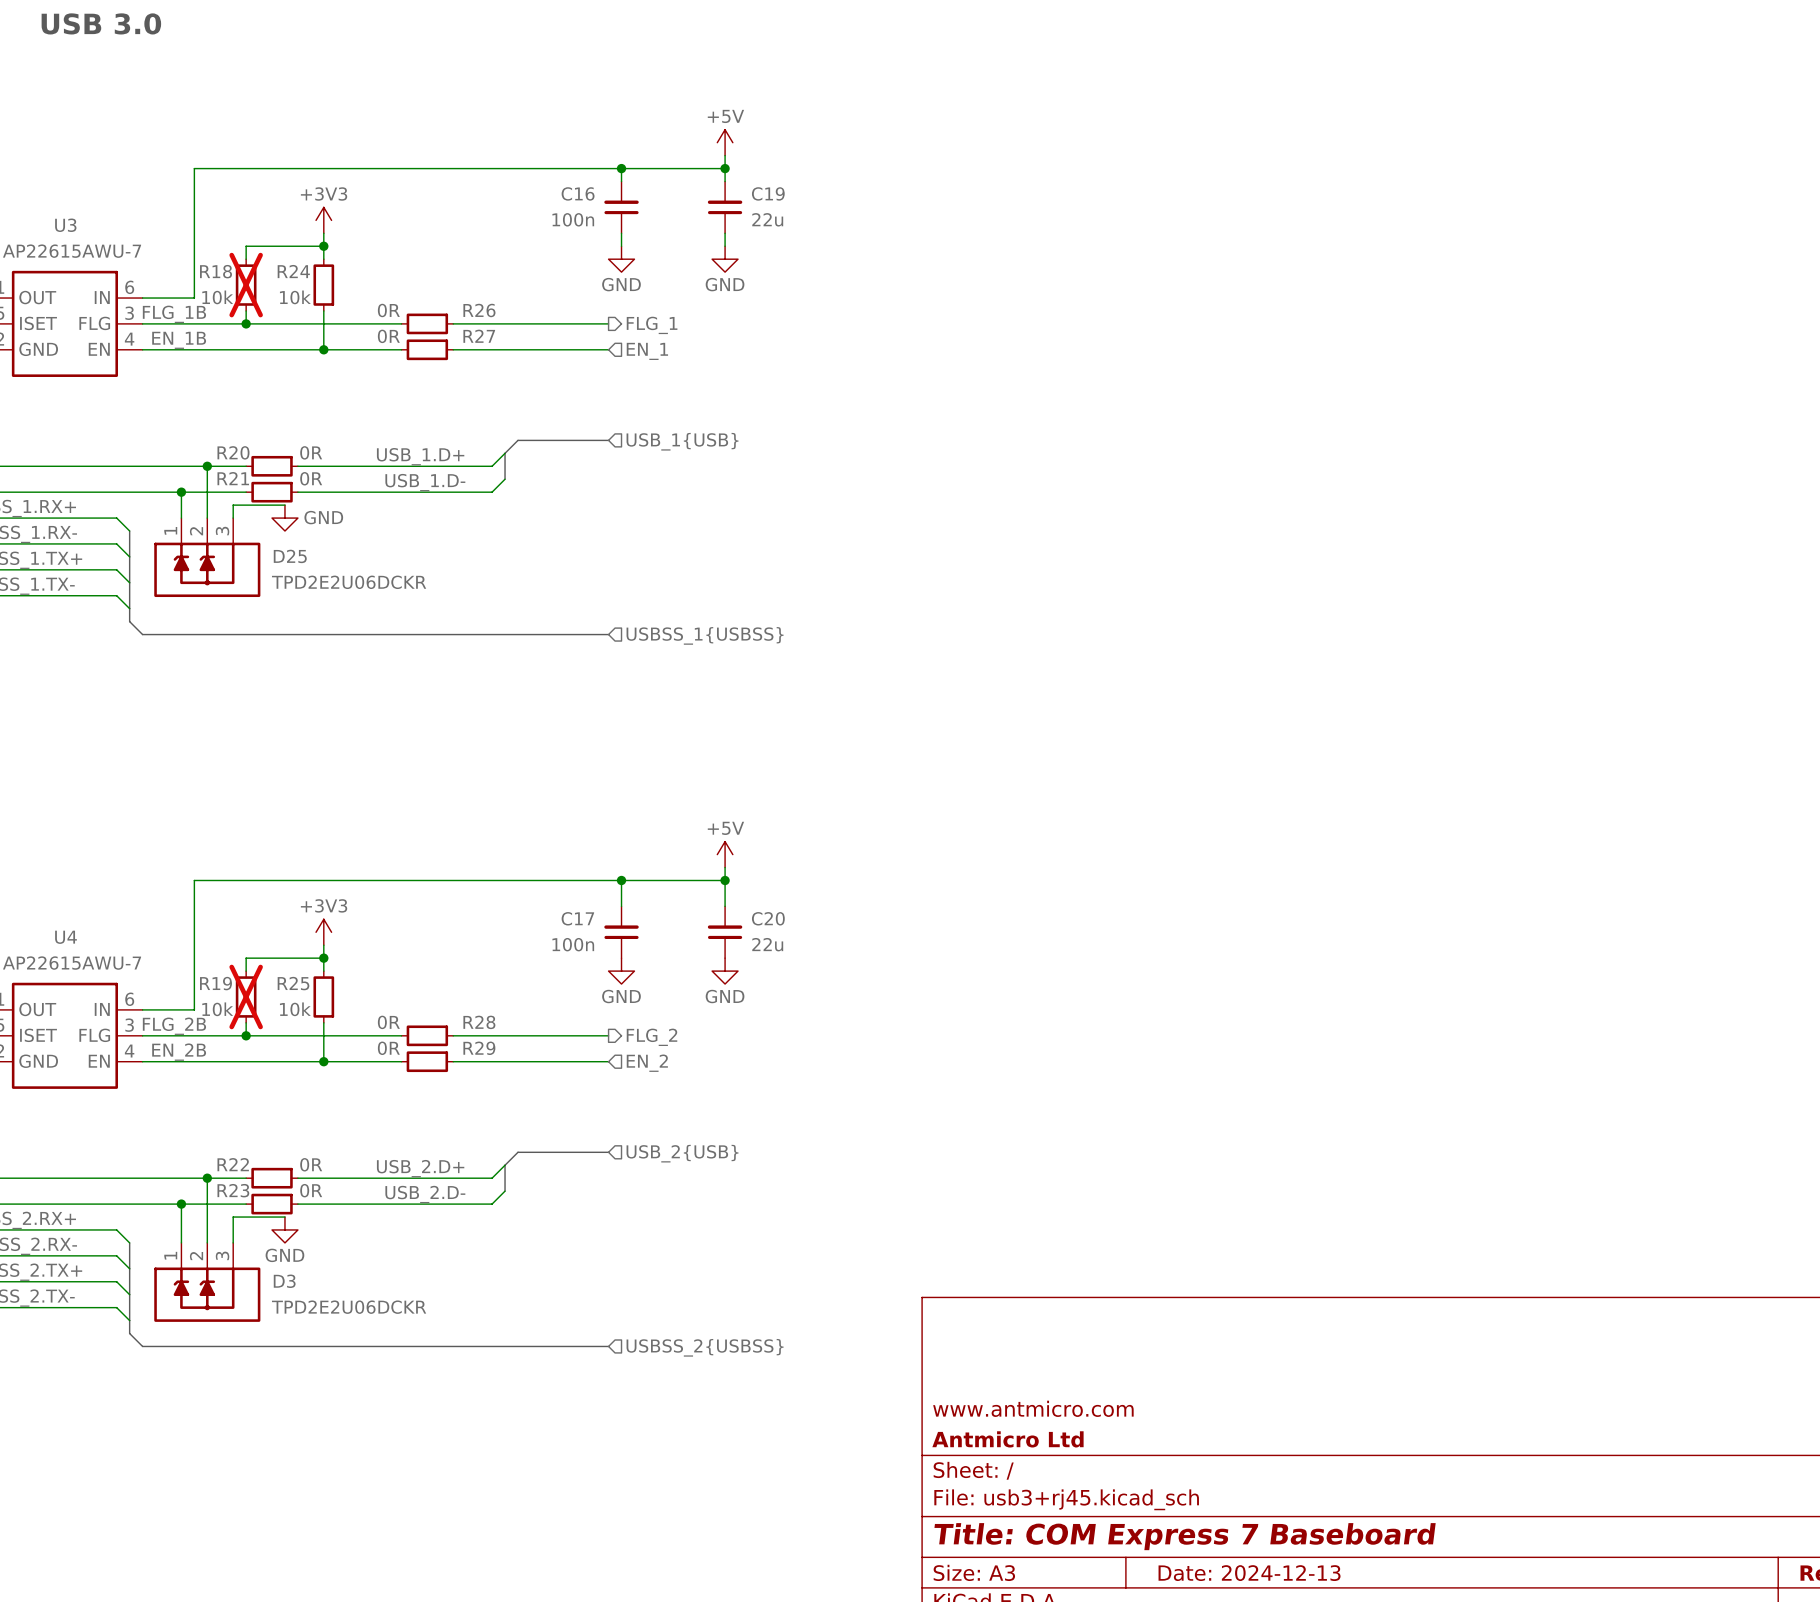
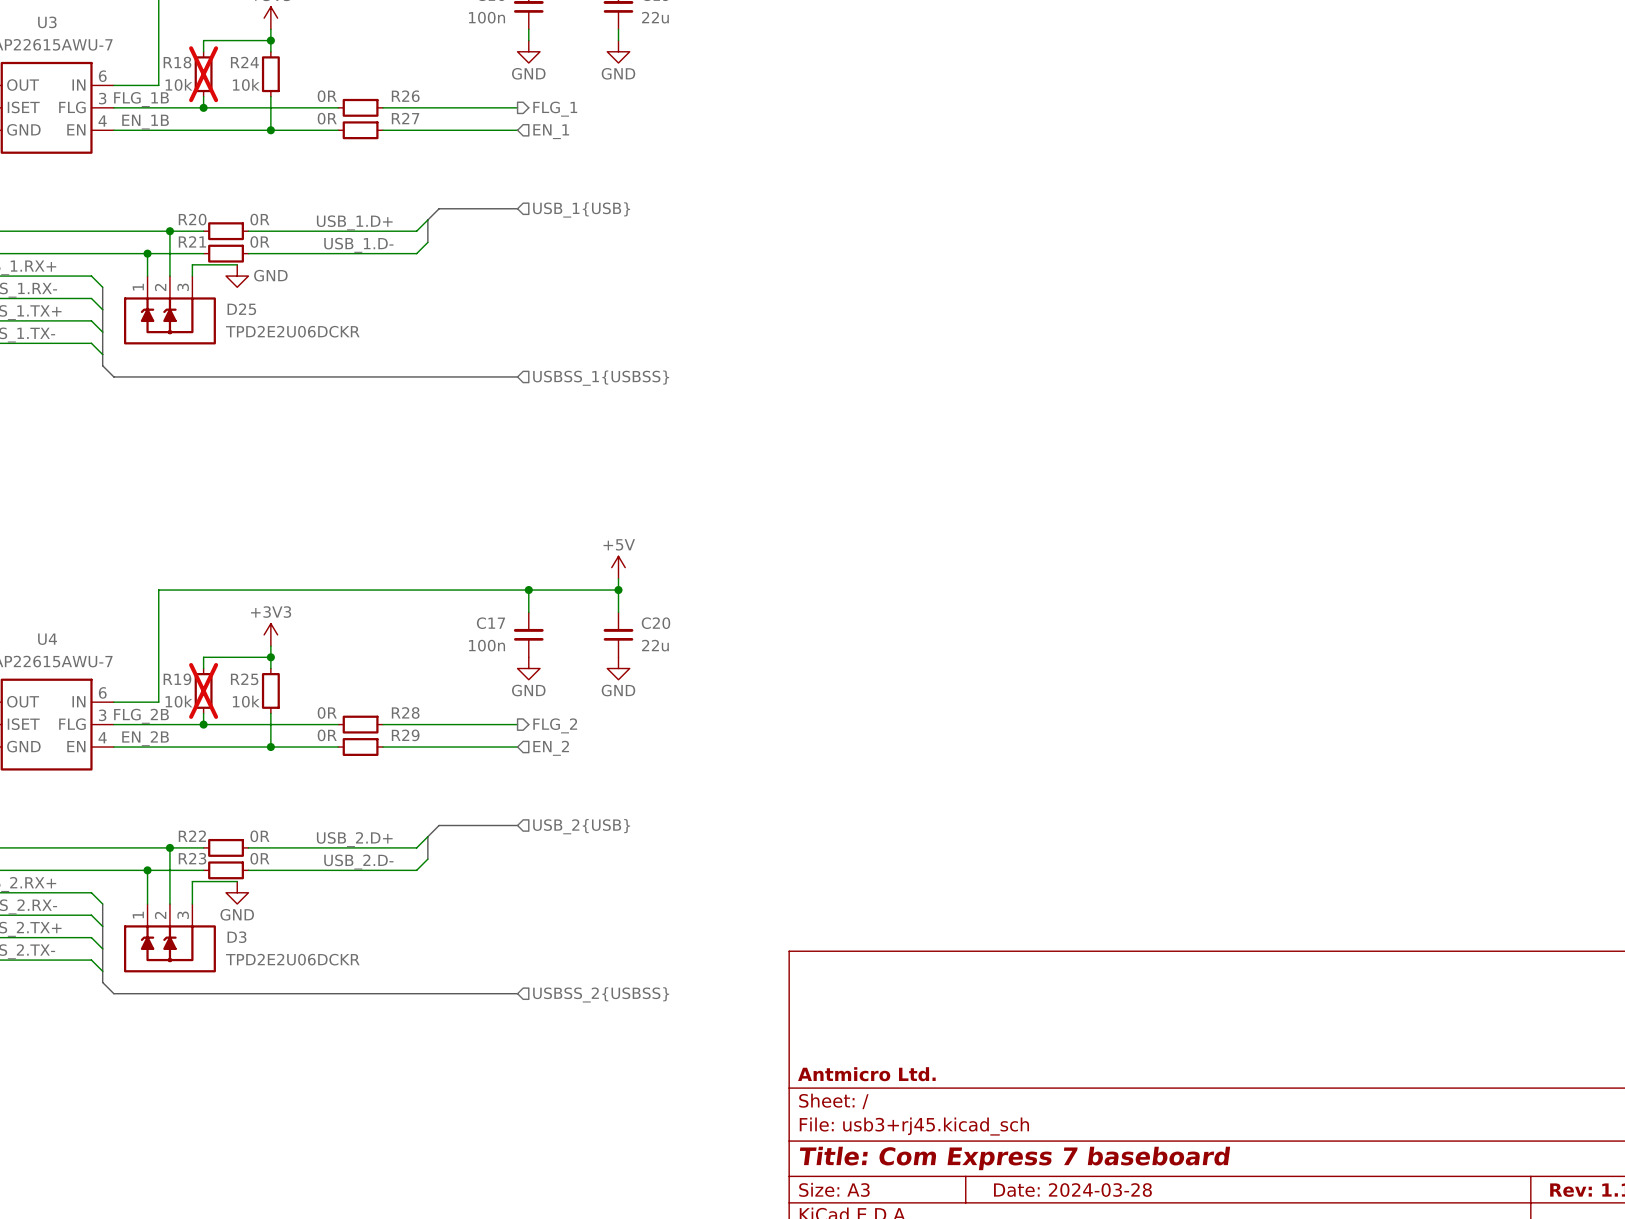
title block: www.antmicro.com (1033, 1408) -> none
title block: Antmicro Ltd (1007, 1439) -> Antmicro Ltd. (866, 1074)
title block: Title: COM Express 7 Baseboard (1185, 1536) -> Title: Com Express 7 baseboard (1015, 1158)
title block: Date: 2024-12-13 (1249, 1573) -> Date: 2024-03-28 (1072, 1190)

